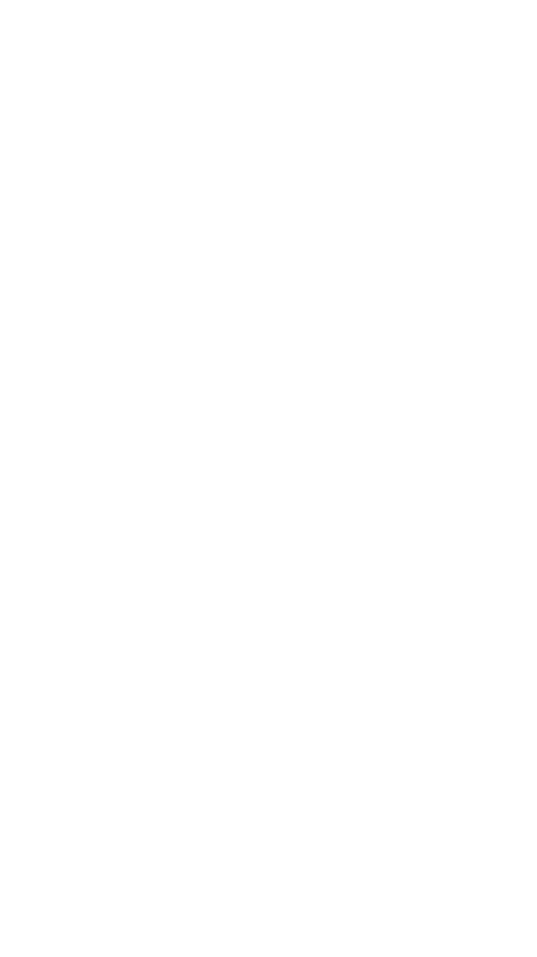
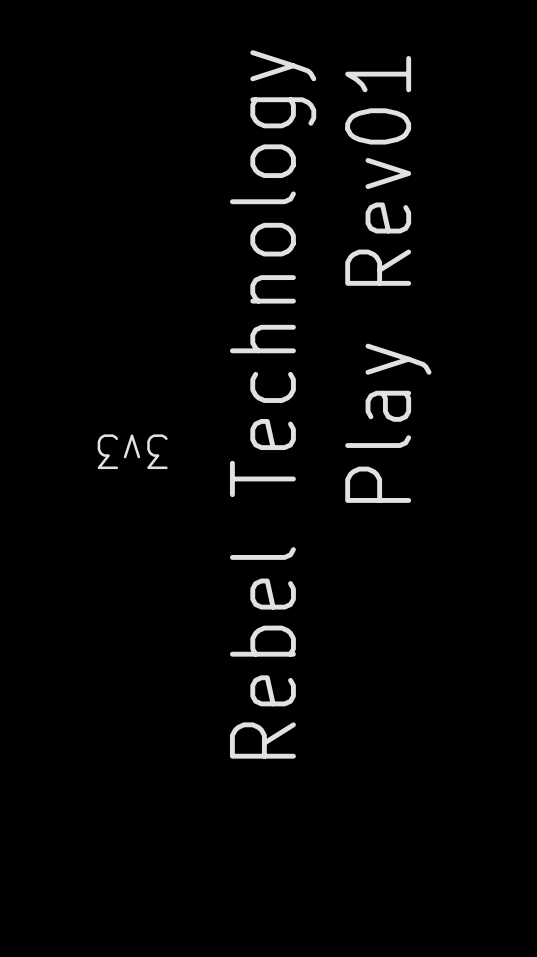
text: none -> Play Rev01 (388, 279)
text: none -> Rebel Technology (273, 404)
text: none -> 3v3 (132, 451)

